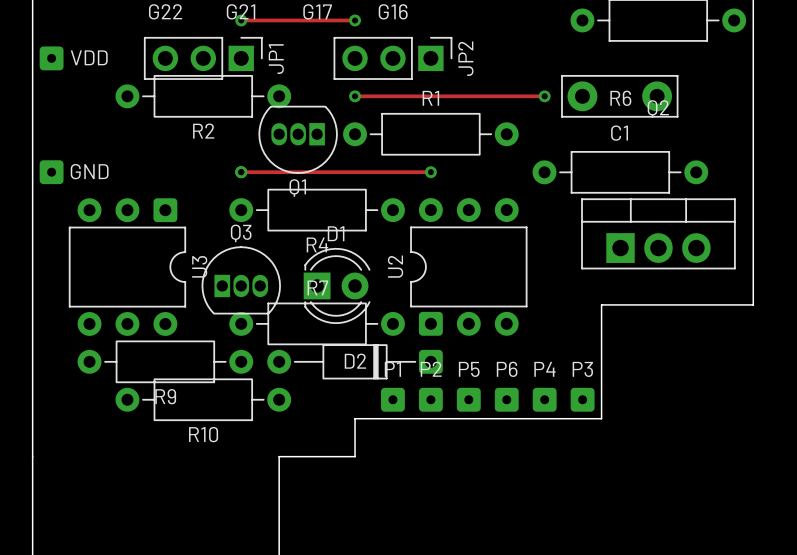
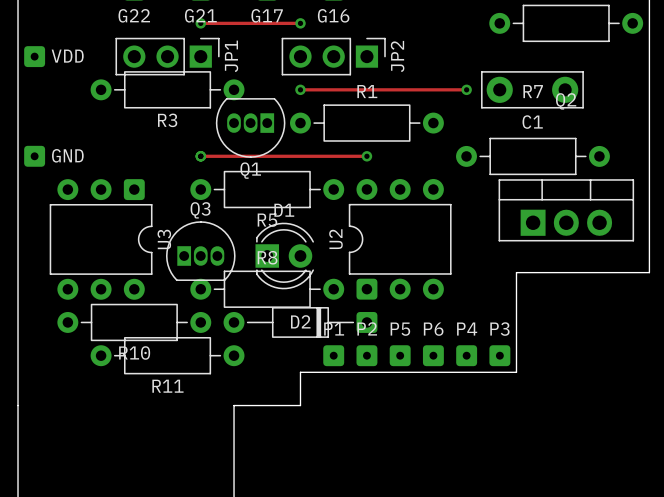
R6 name: R6 (620, 98) -> R7 (533, 91)
R2 name: R2 (203, 131) -> R3 (167, 120)
R4 name: R4 (317, 244) -> R5 (267, 220)
R7 name: R7 (317, 287) -> R8 (267, 257)
R9 name: R9 (165, 396) -> R10 (134, 352)
R10 name: R10 (203, 434) -> R11 (167, 386)

